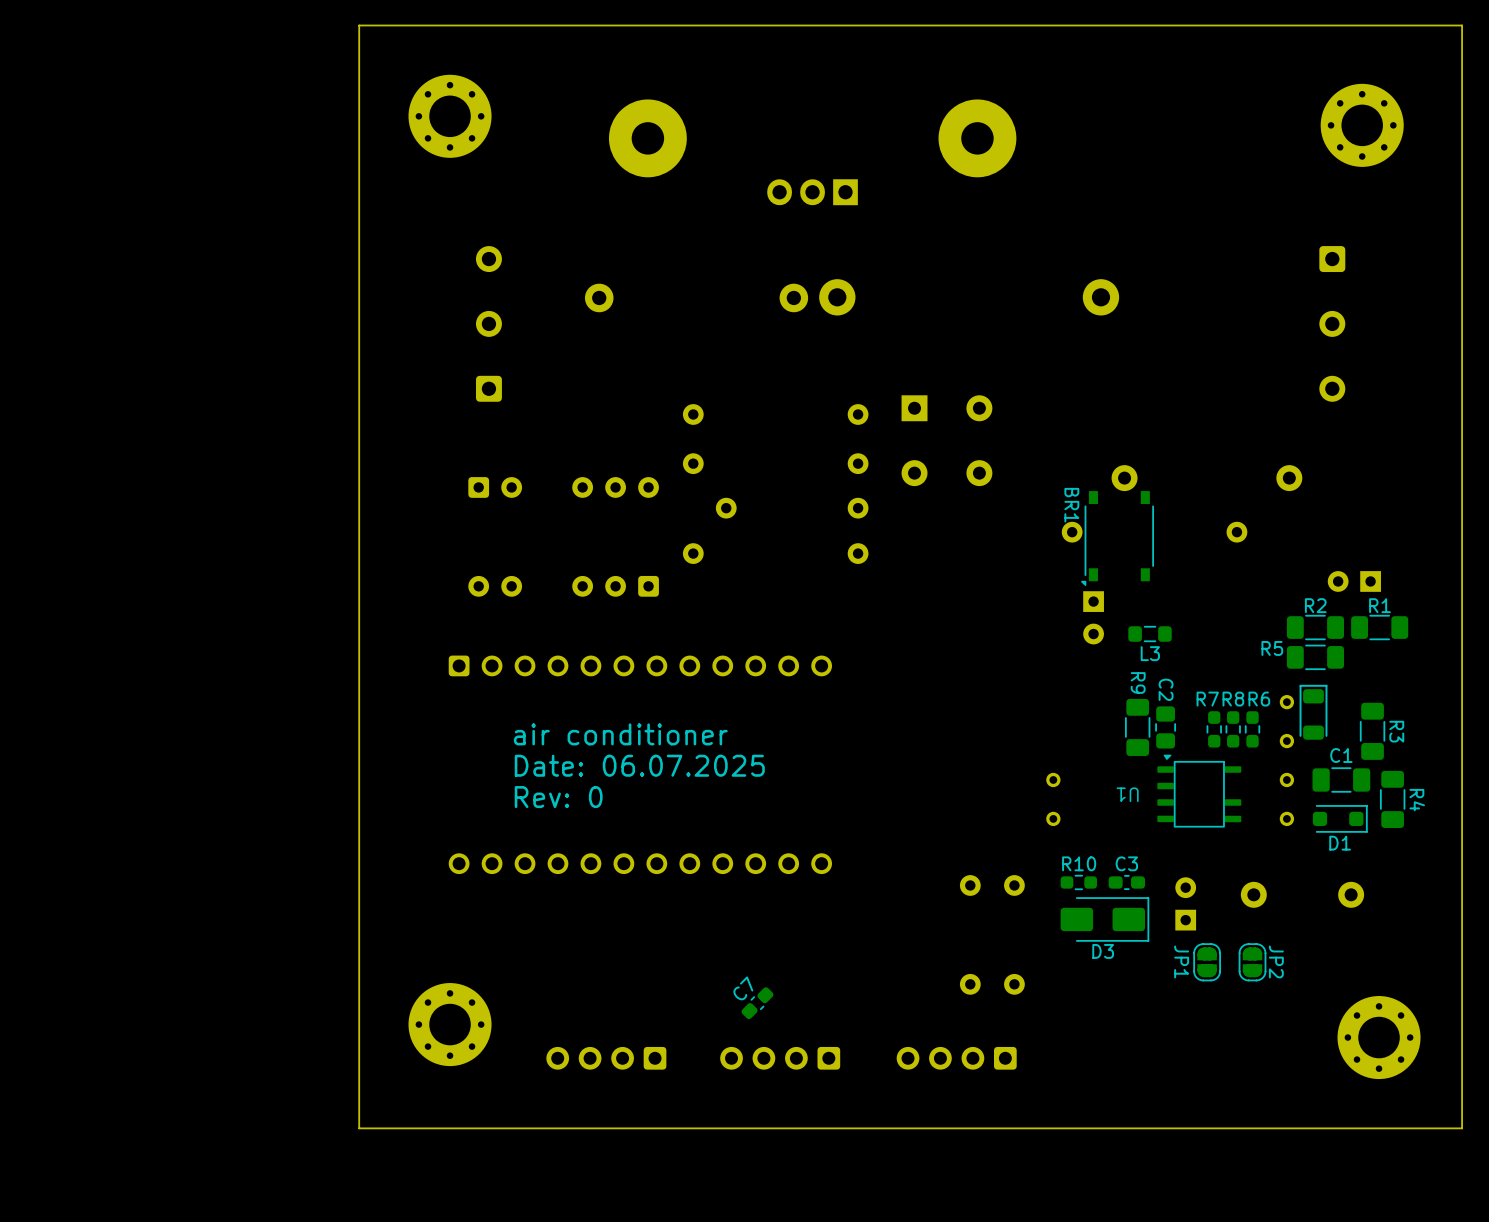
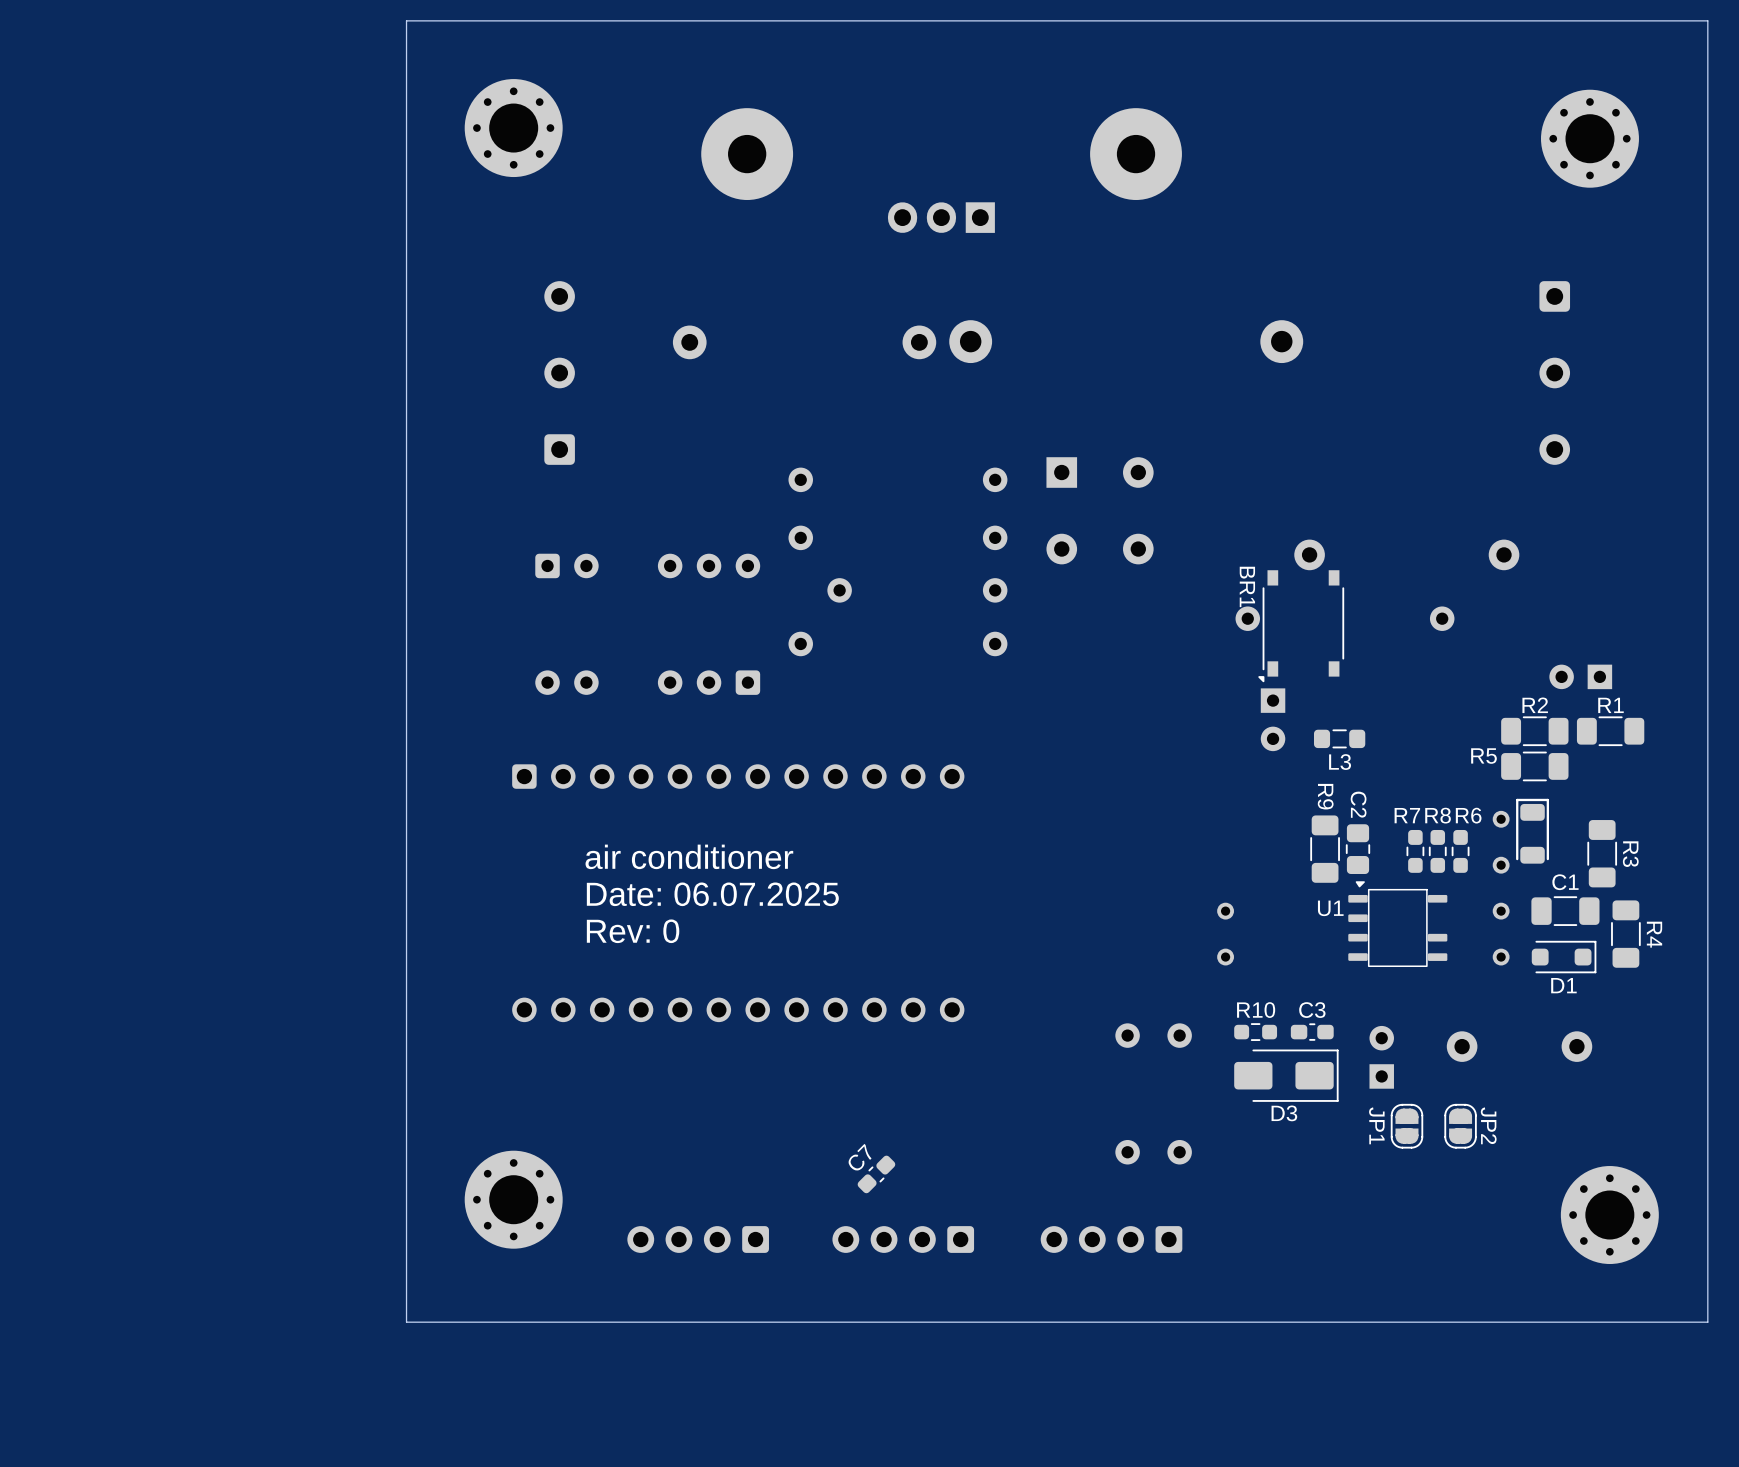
U1 name rotation: 0° (1127, 794) -> 180° (1330, 908)

